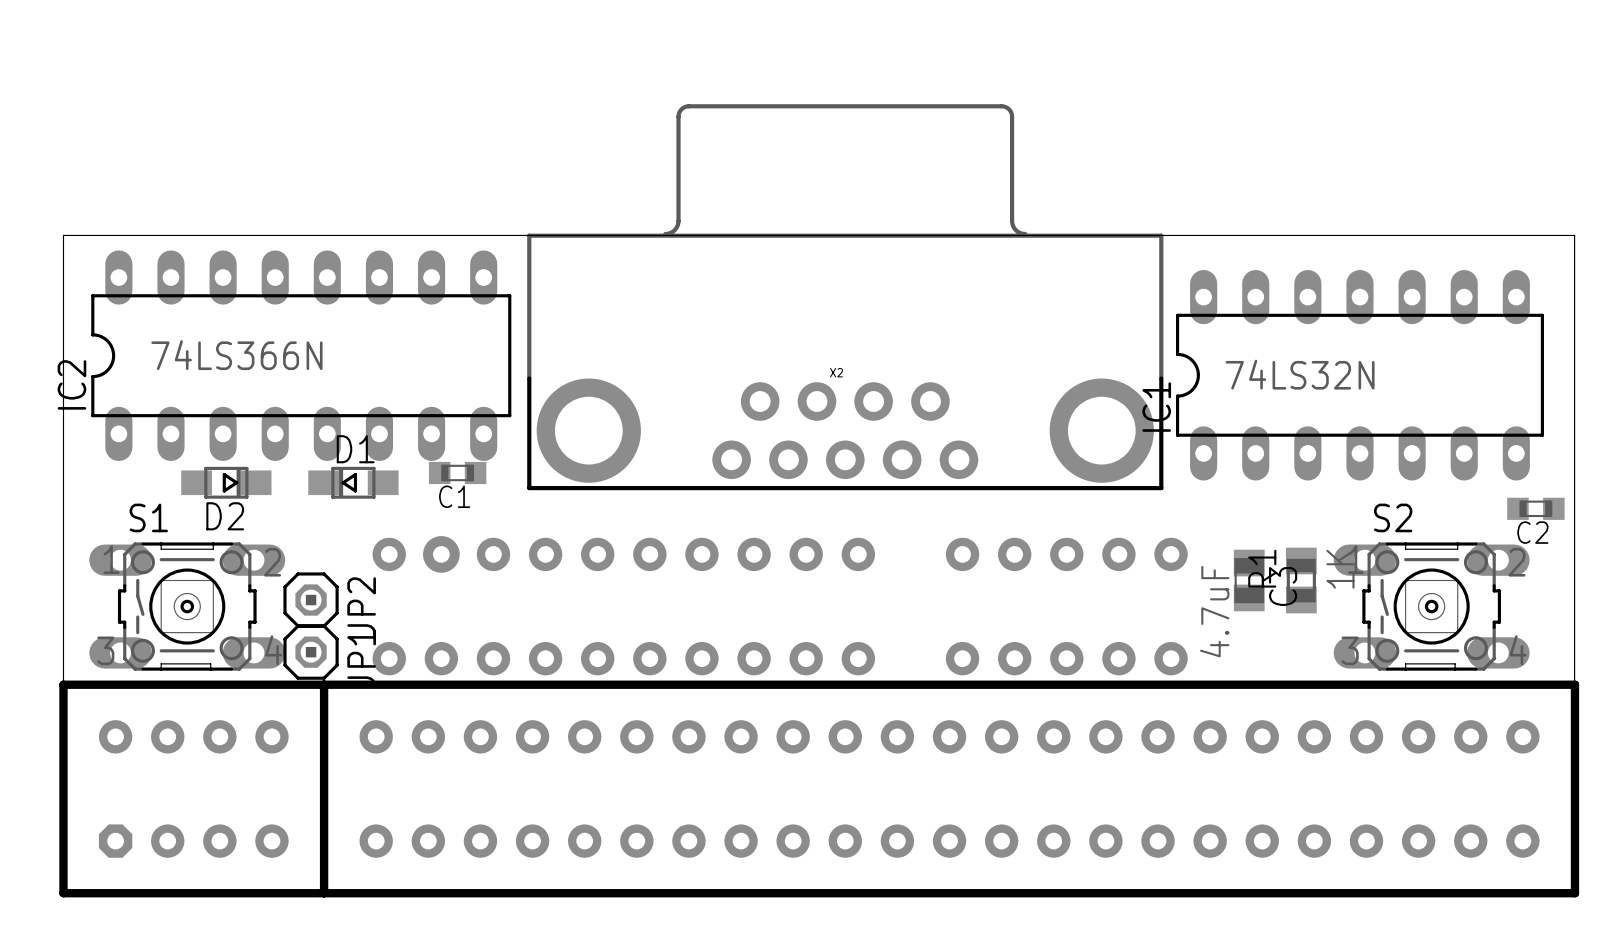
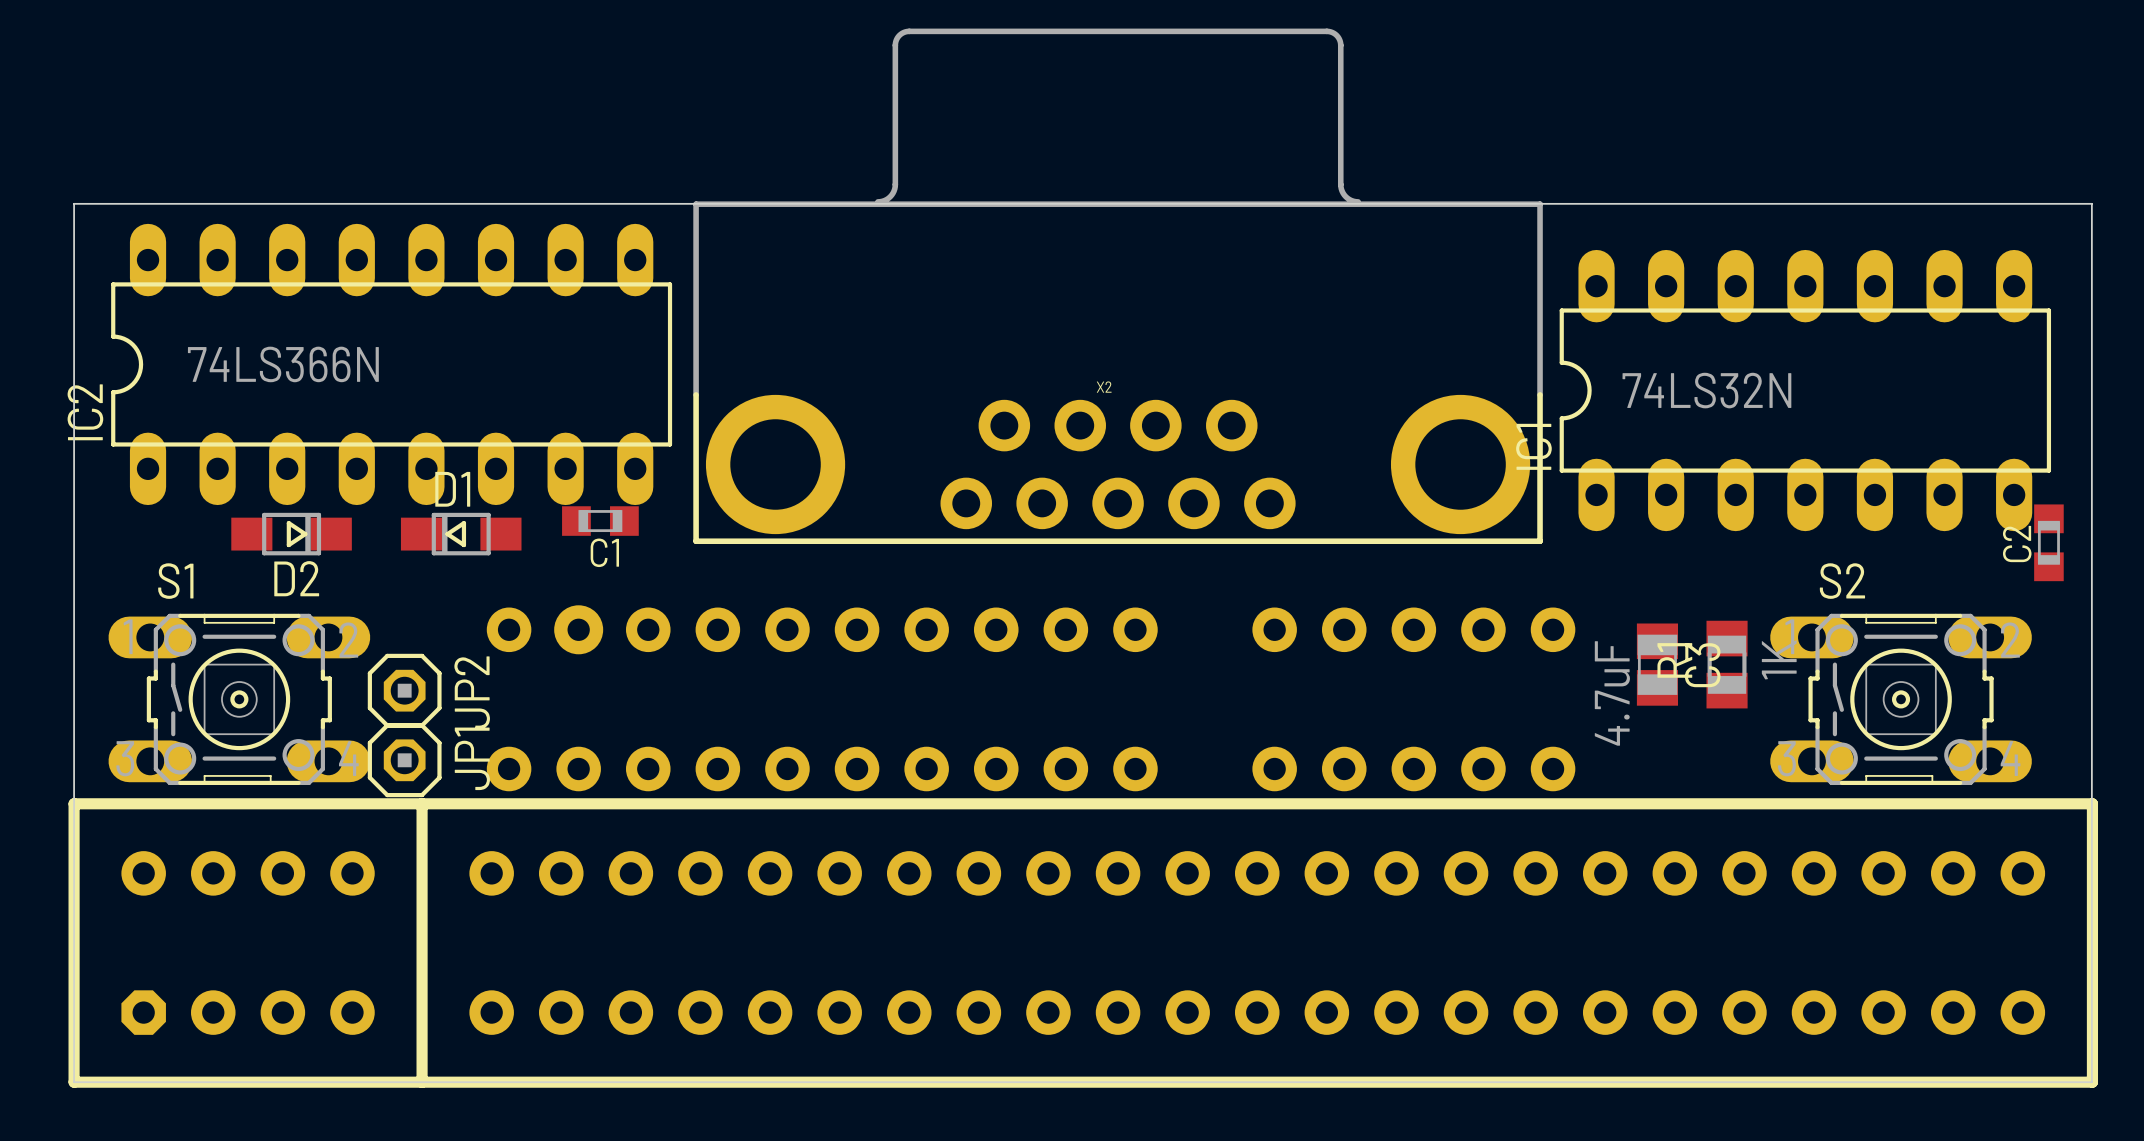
C2 rotation: 0° (1535, 508) -> 90° clockwise (2048, 542)

